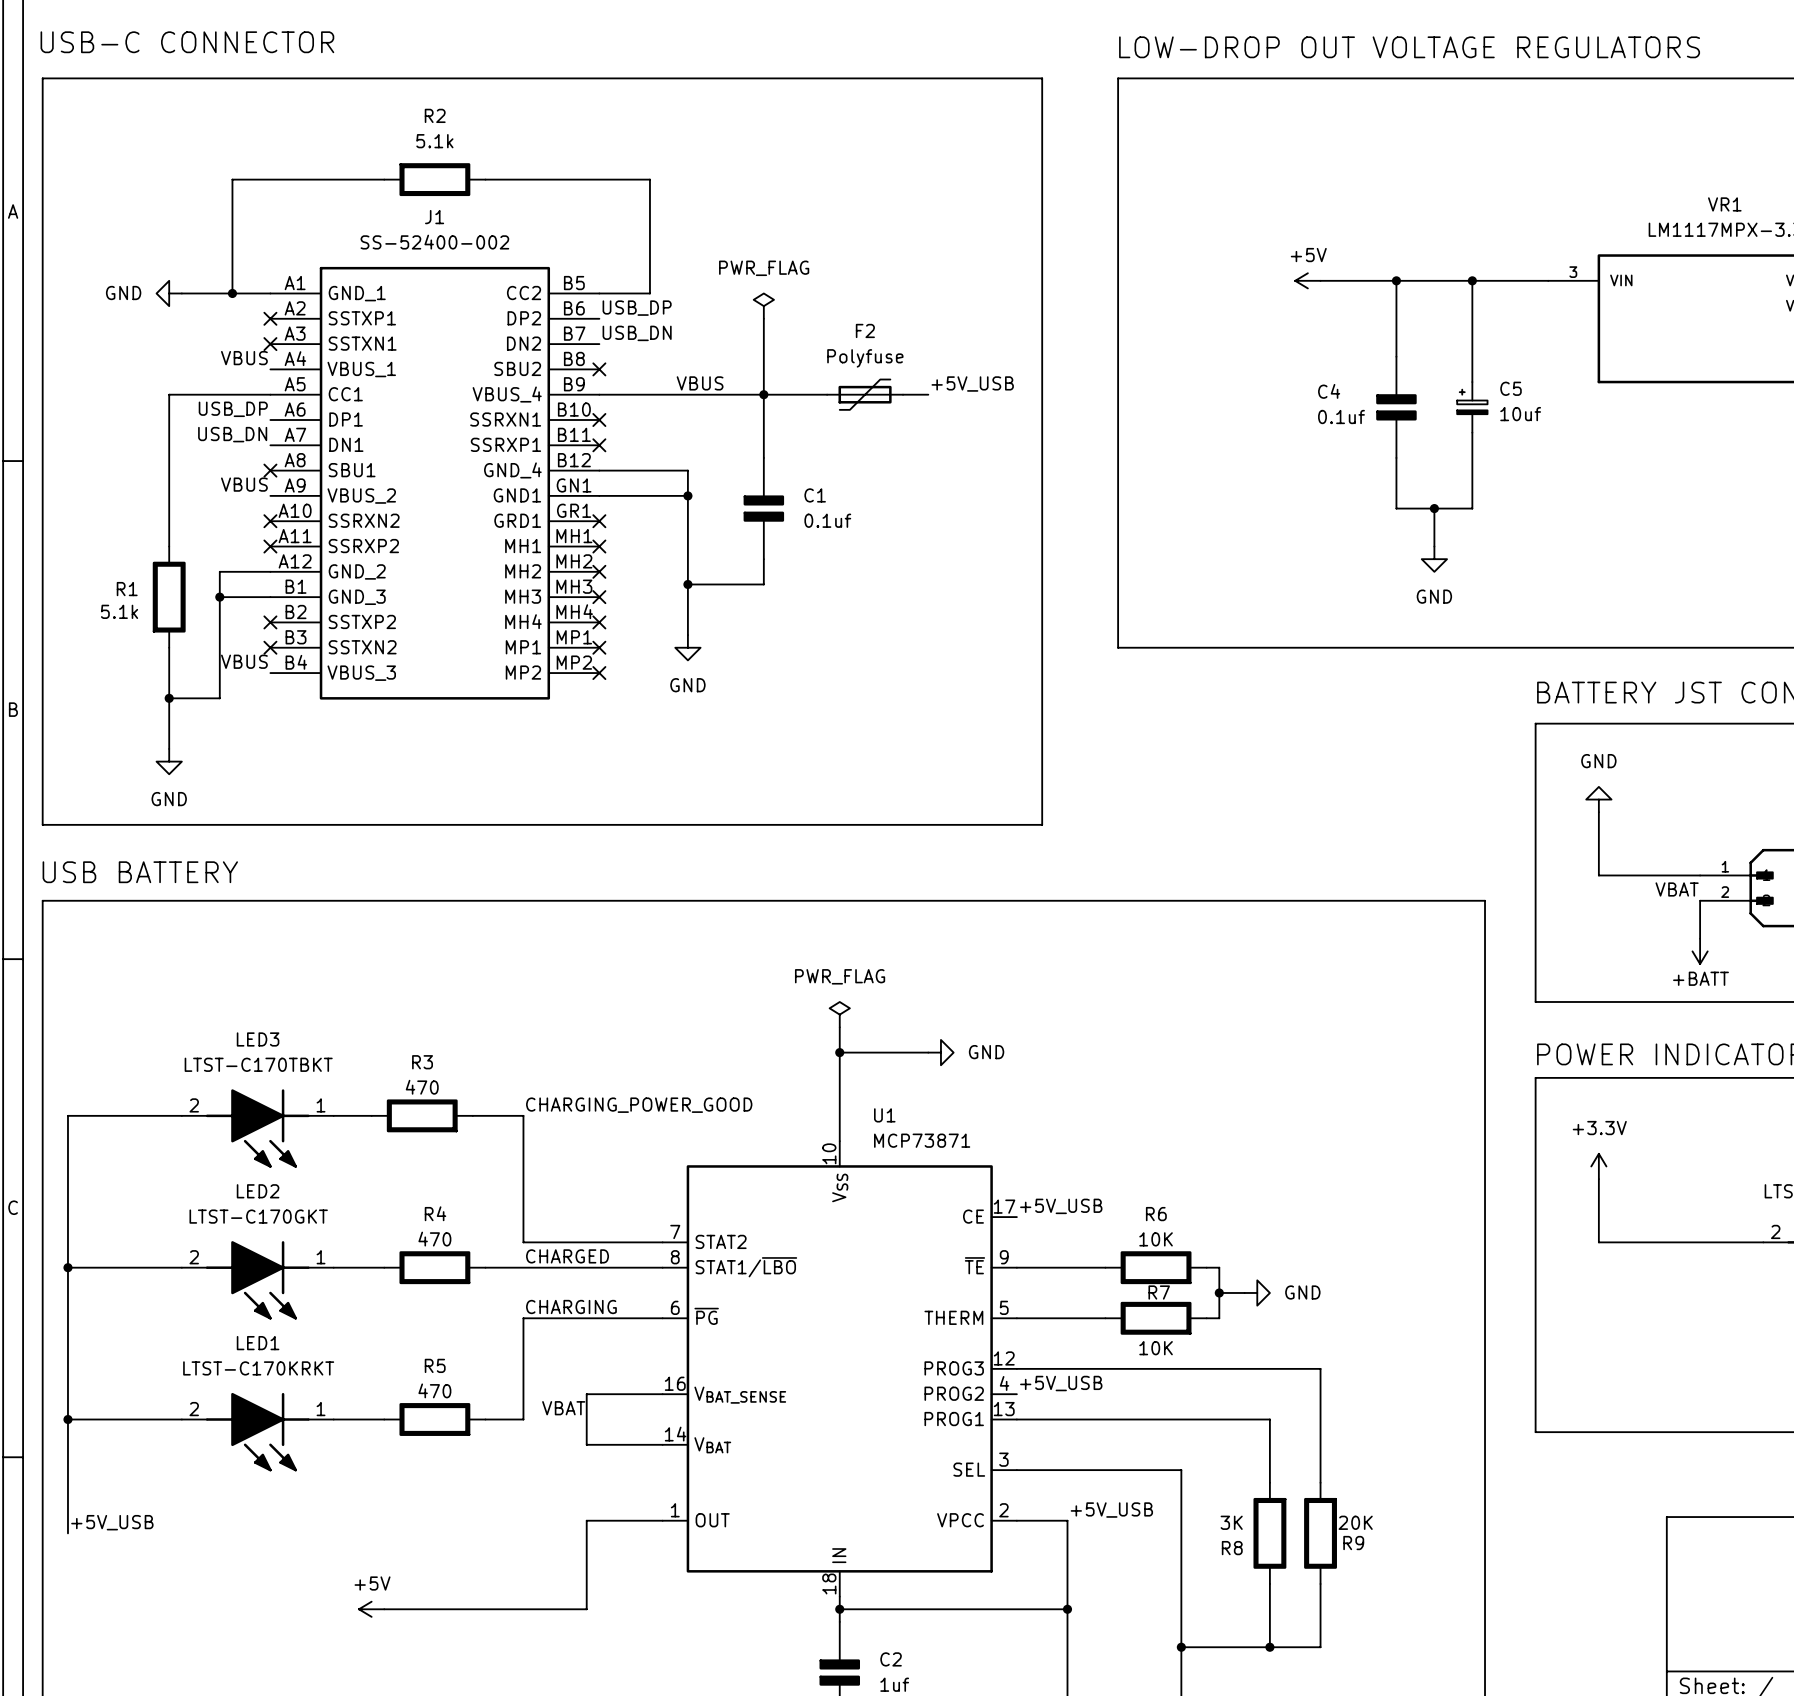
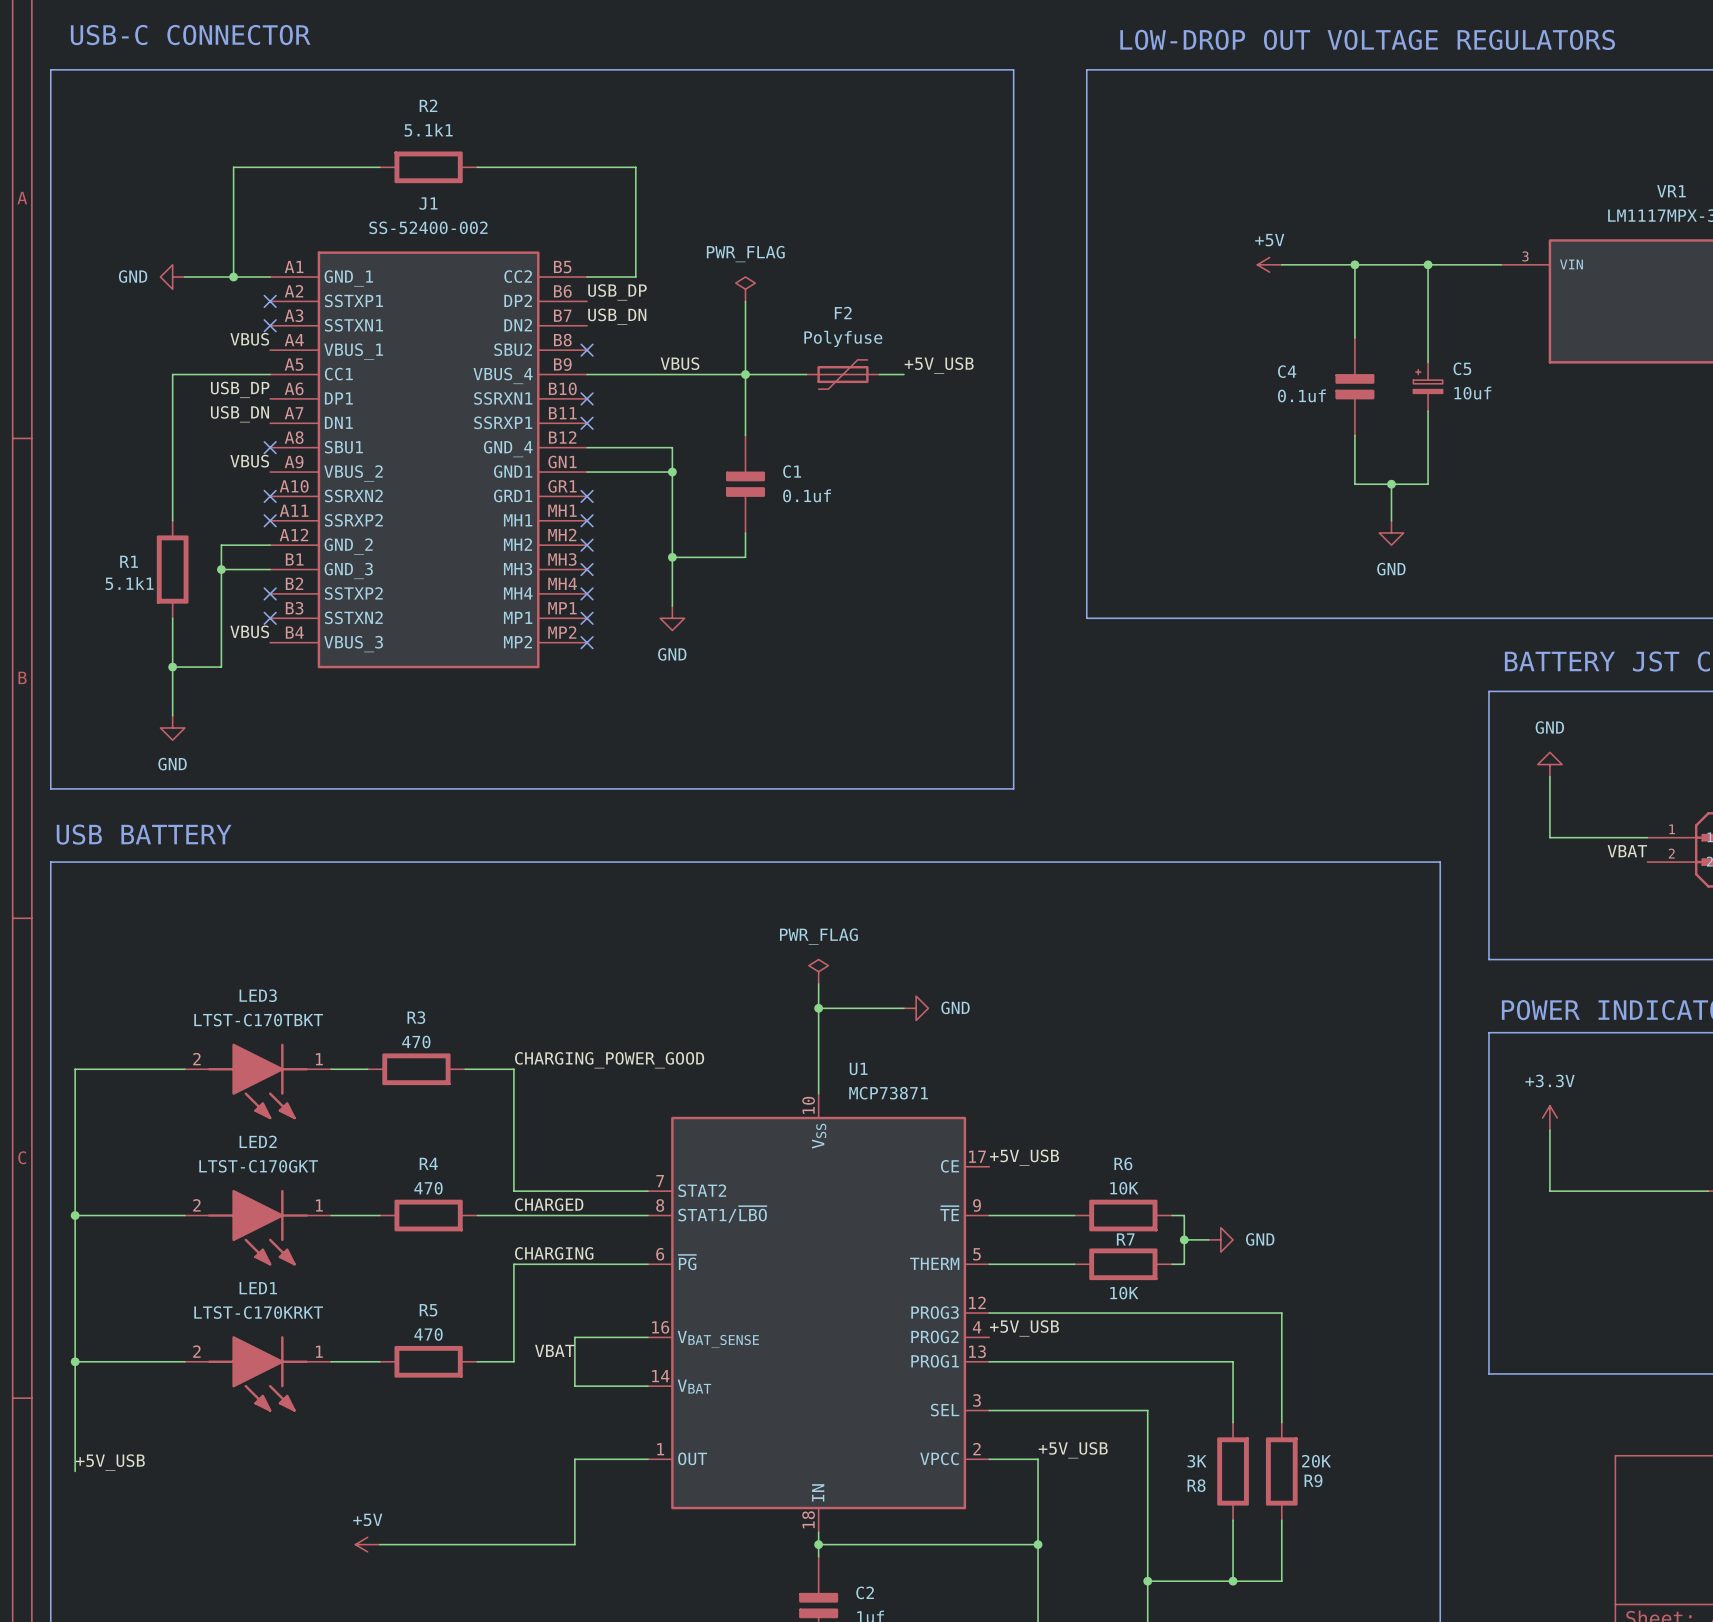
R2 value: 5.1k (434, 141) -> 5.1k1 (428, 130)
R1 value: 5.1k (119, 611) -> 5.1k1 (129, 583)
wire: (1700, 900) (1700, 938) -> none
power symbol: +BATT (1700, 951) -> none

